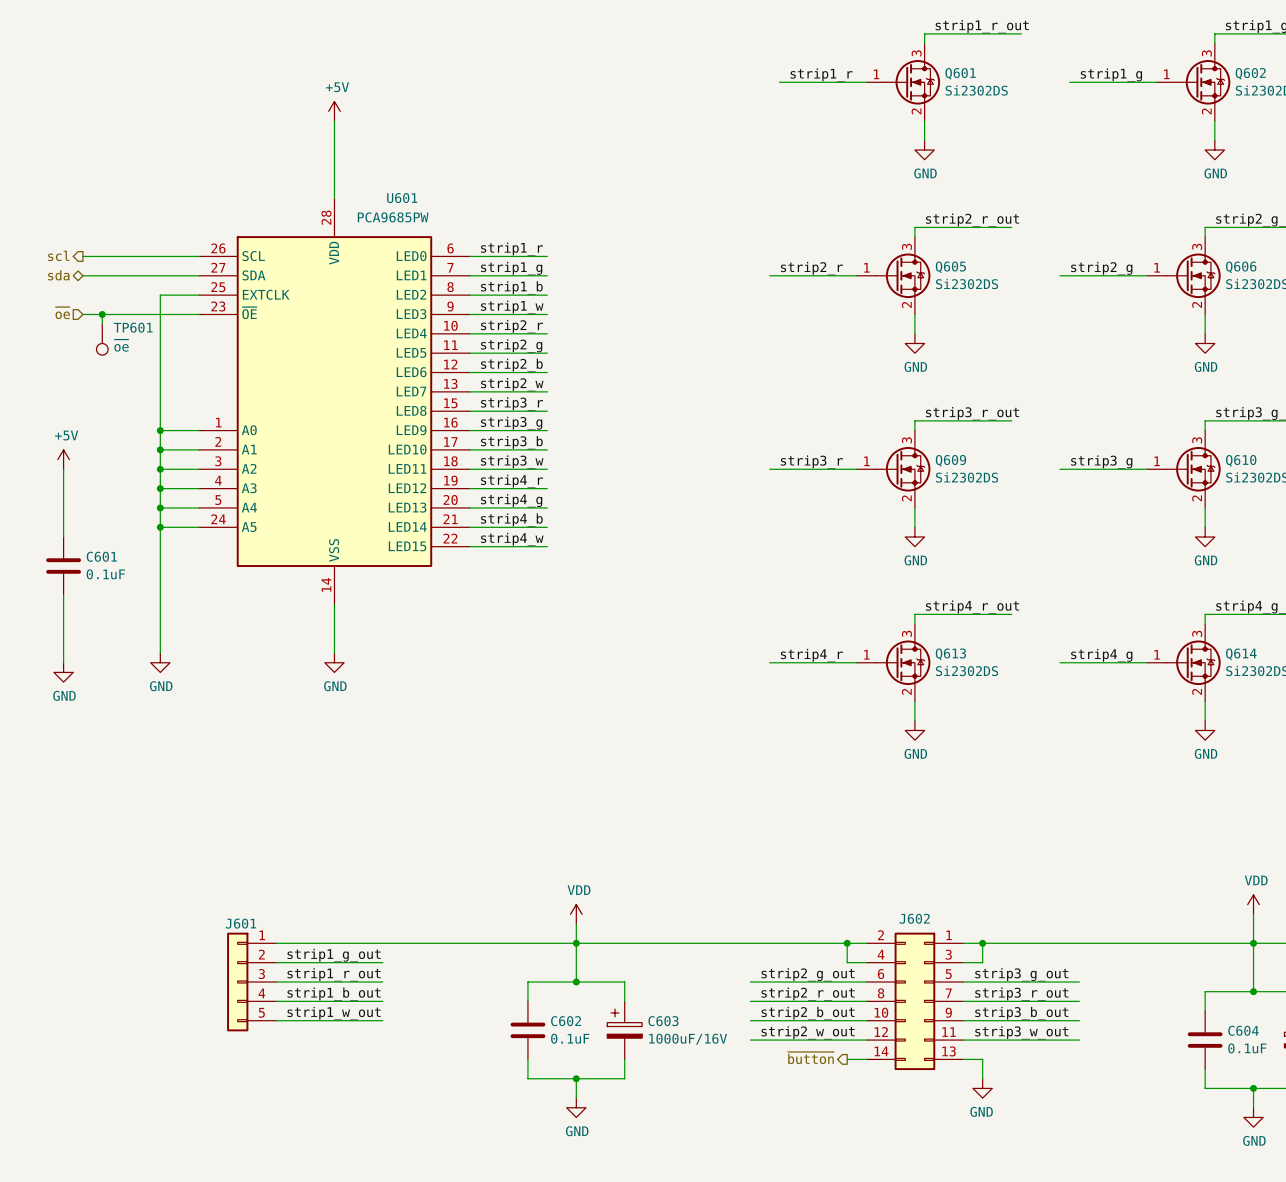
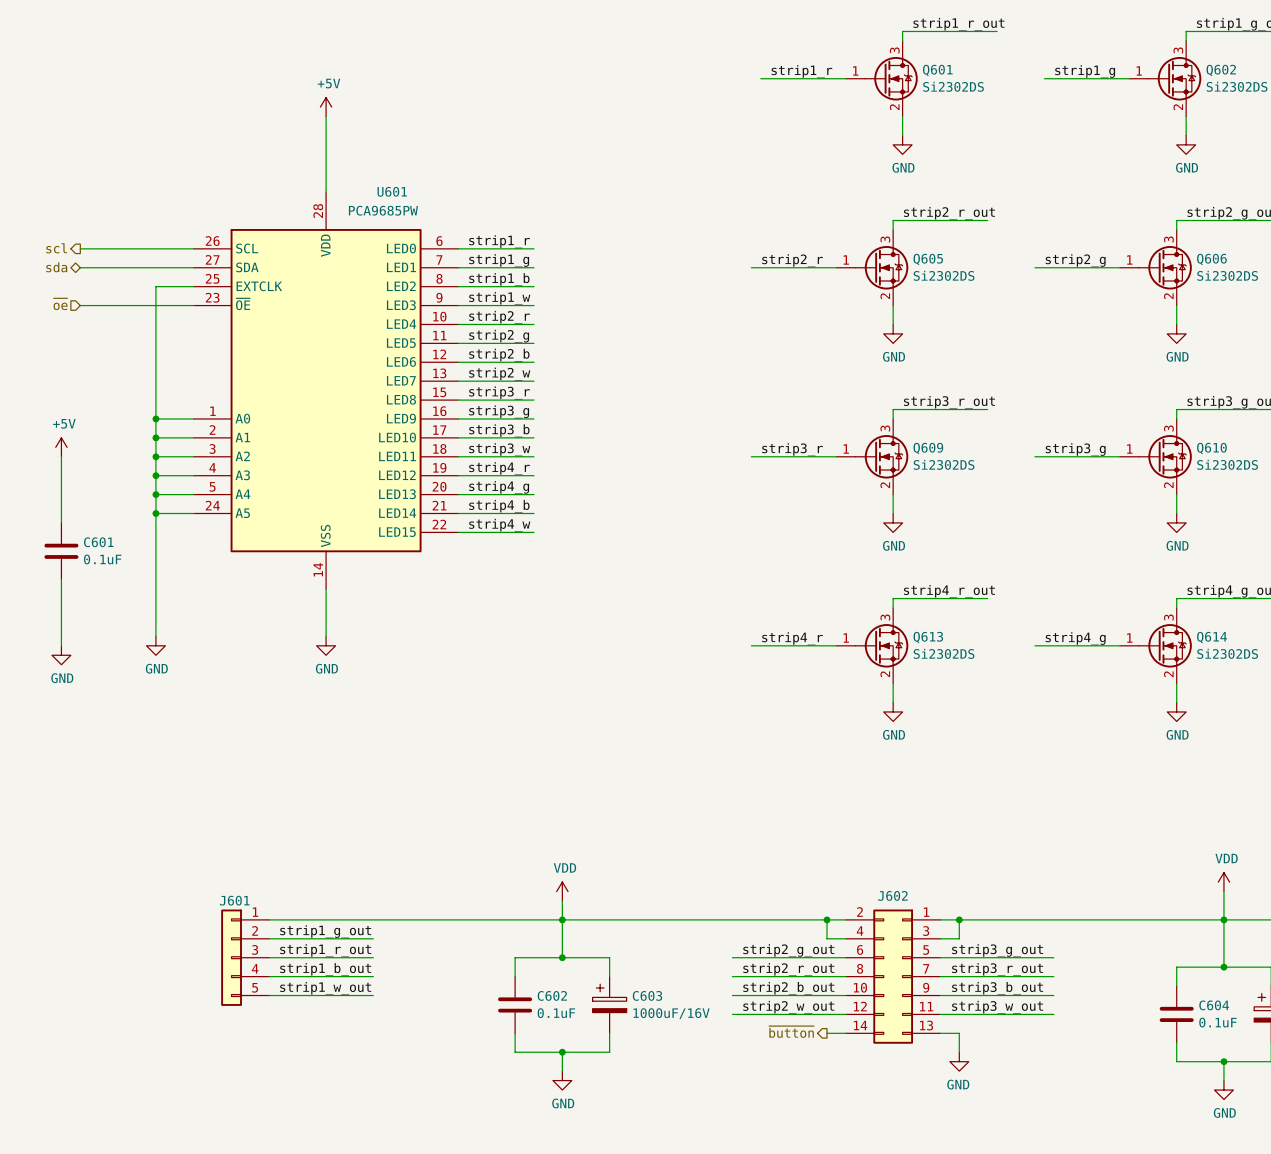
wire: (102, 314) (102, 324) -> none
junction: (102, 314) -> none
TP601: ~{oe} (102, 339) -> none

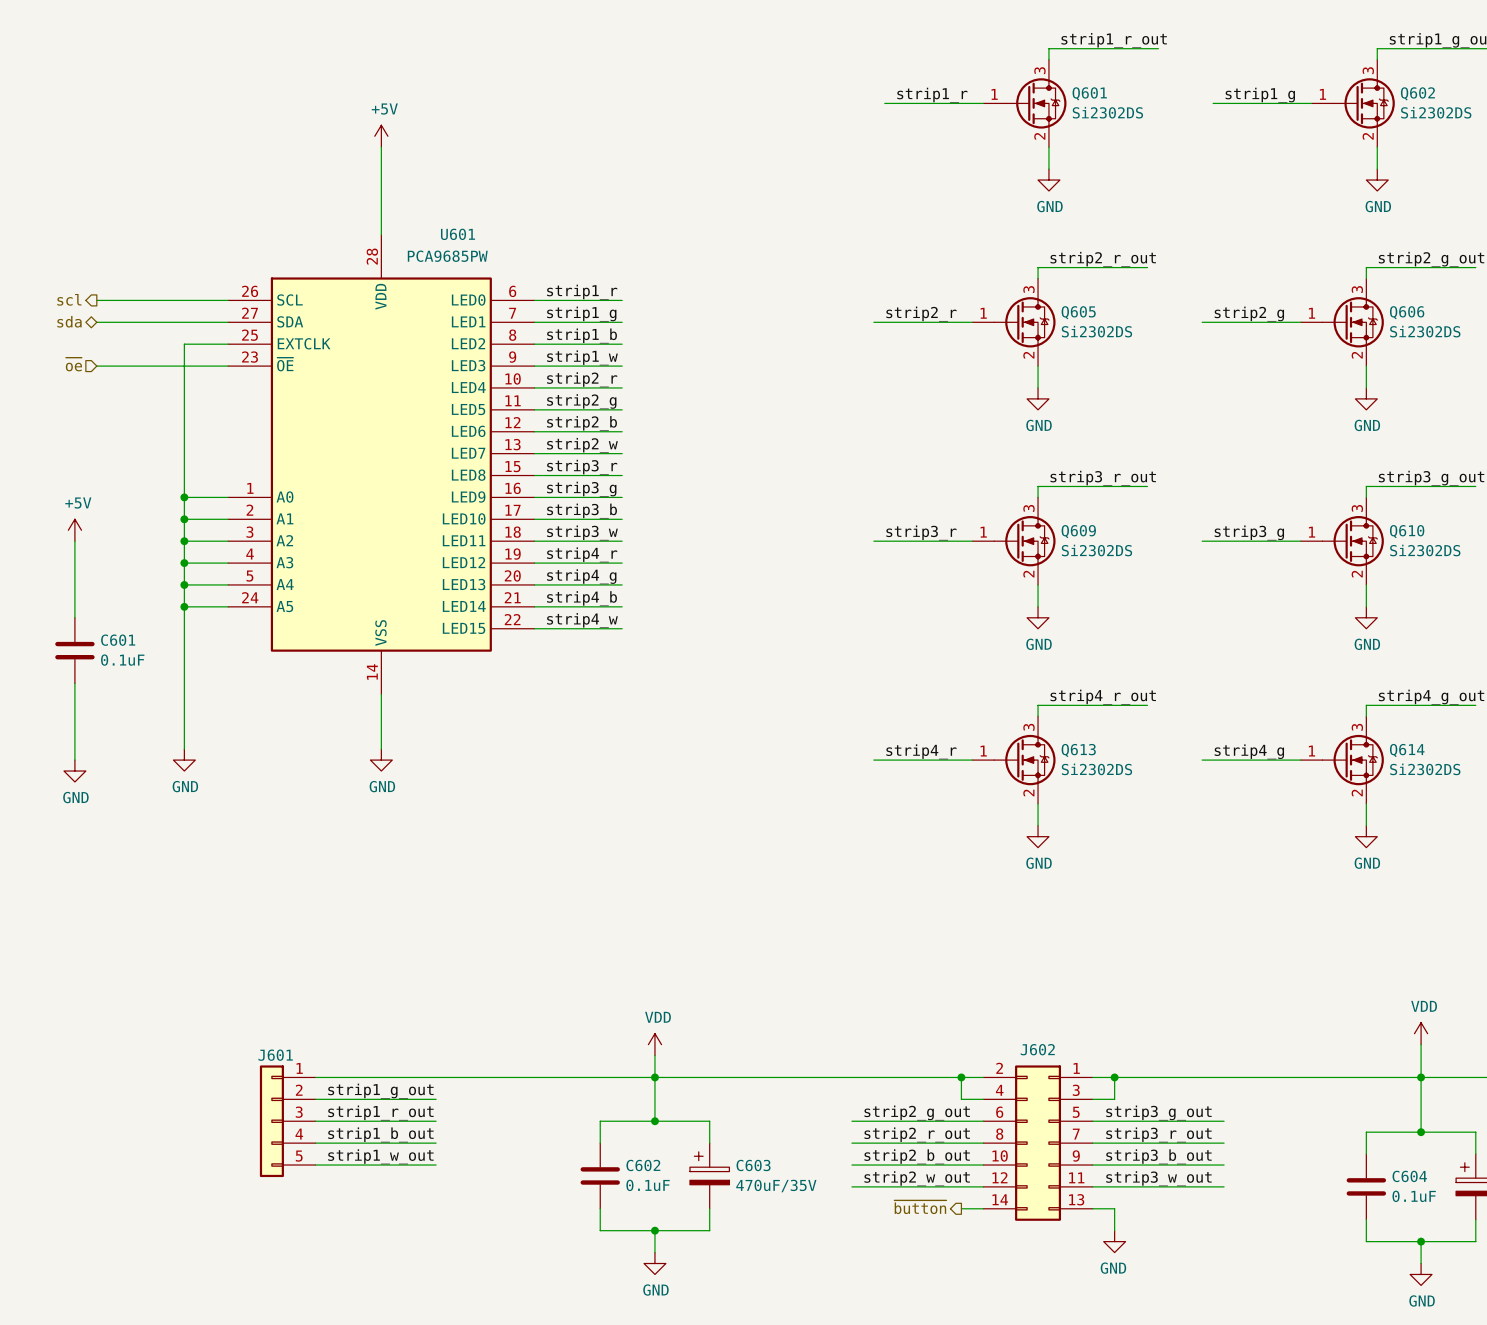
C603 value: 1000uF/16V (671, 1013) -> 470uF/35V (776, 1185)

